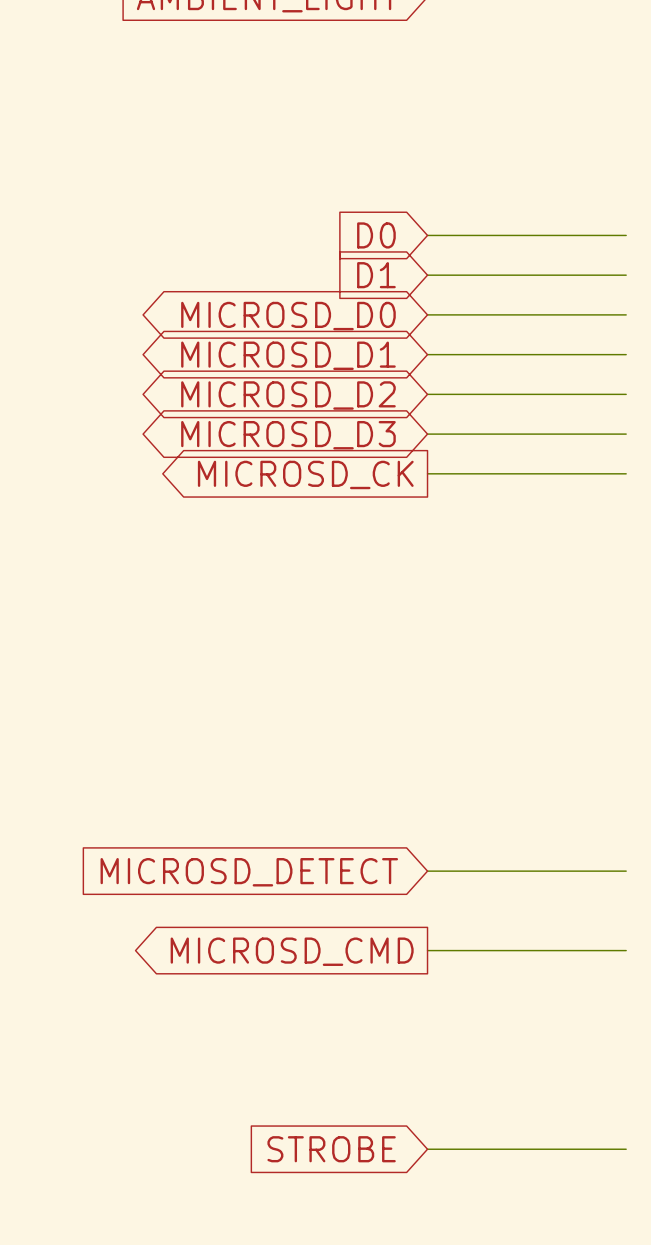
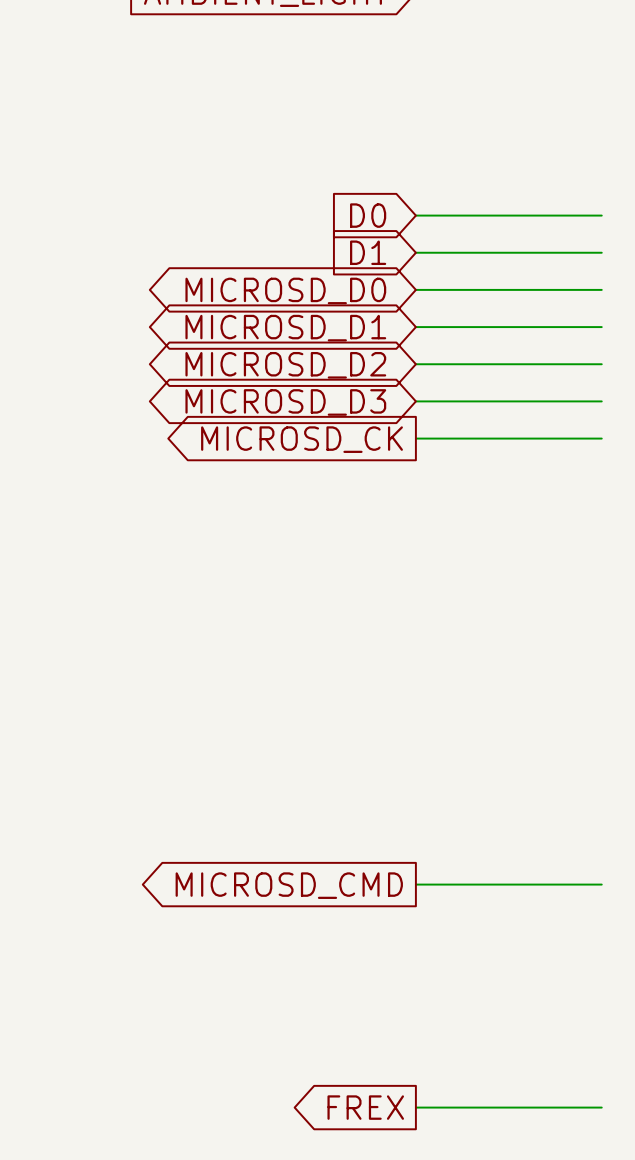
wire: (427, 871) (626, 871) -> none
global label: MICROSD_DETECT (249, 872) -> none
global label: STROBE (331, 1149) -> none
wire: (427, 1149) (626, 1149) -> (415, 1107) (601, 1107)
global label: none -> FREX (365, 1107)

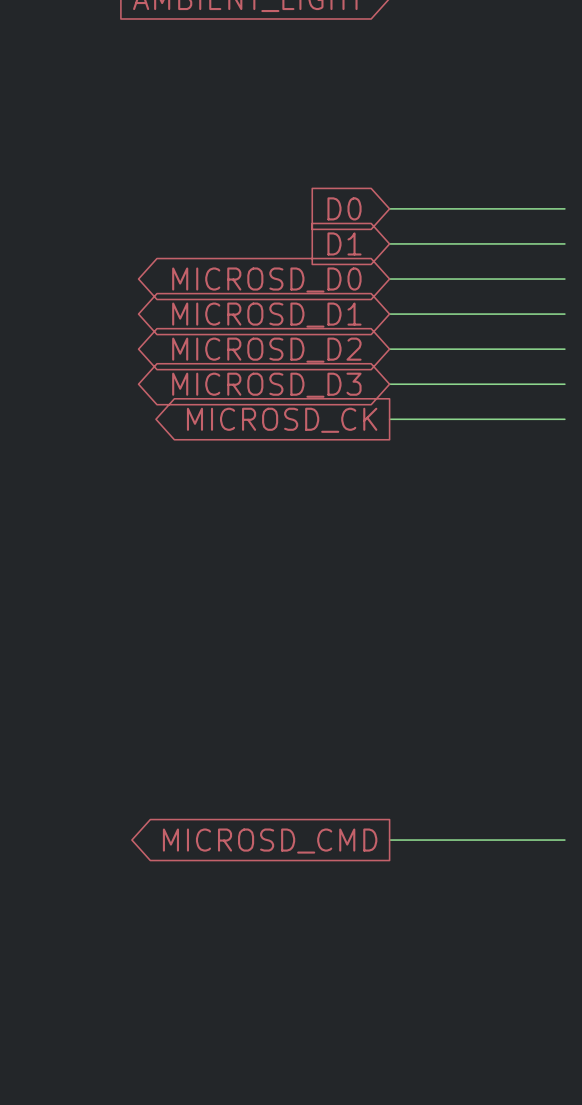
global label: FREX (365, 1107) -> none
wire: (415, 1107) (601, 1107) -> none

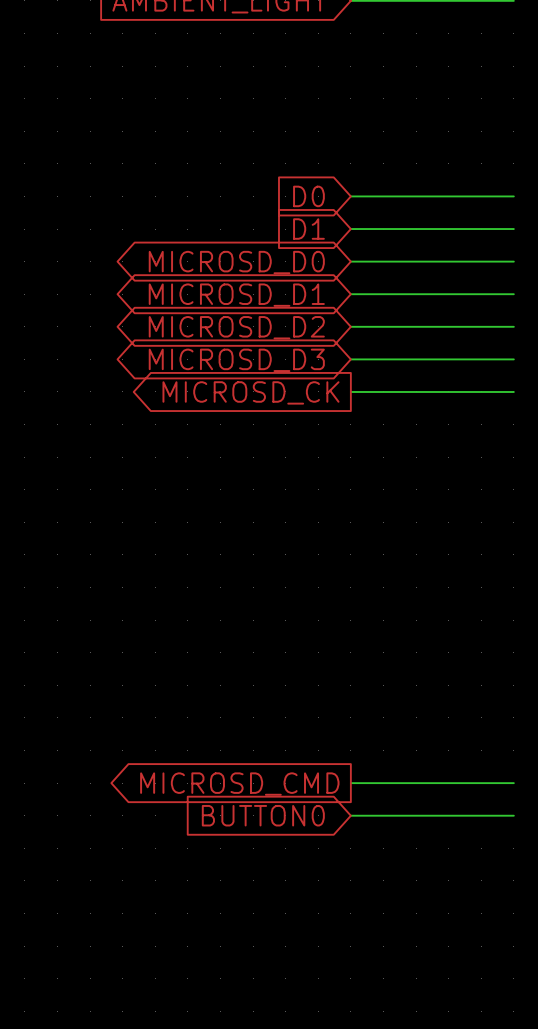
global label: none -> BUTTON0 (263, 815)
wire: none -> (350, 815) (513, 815)

